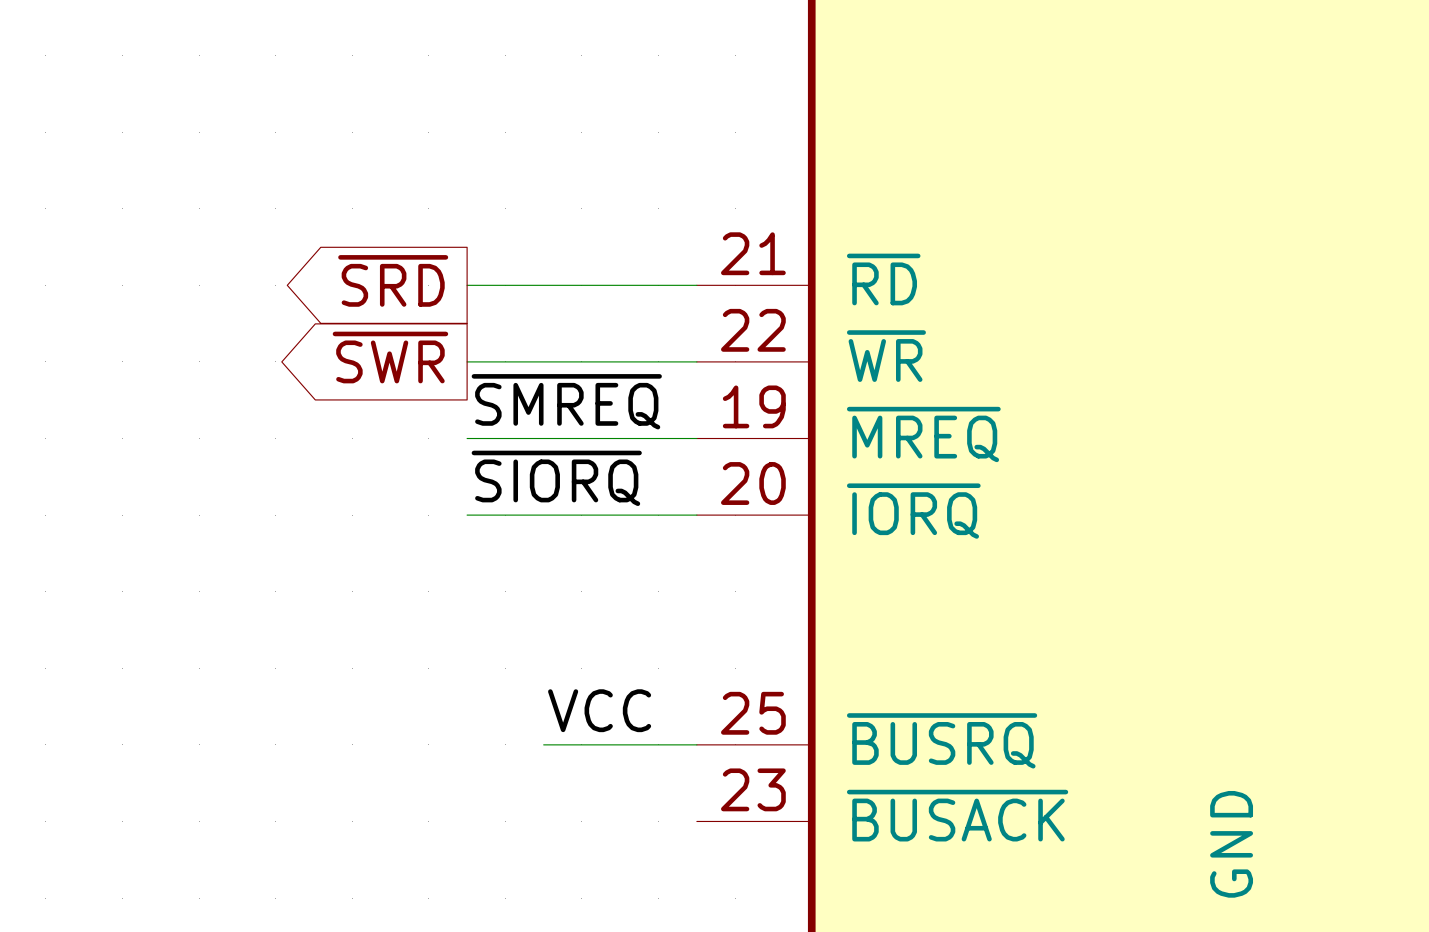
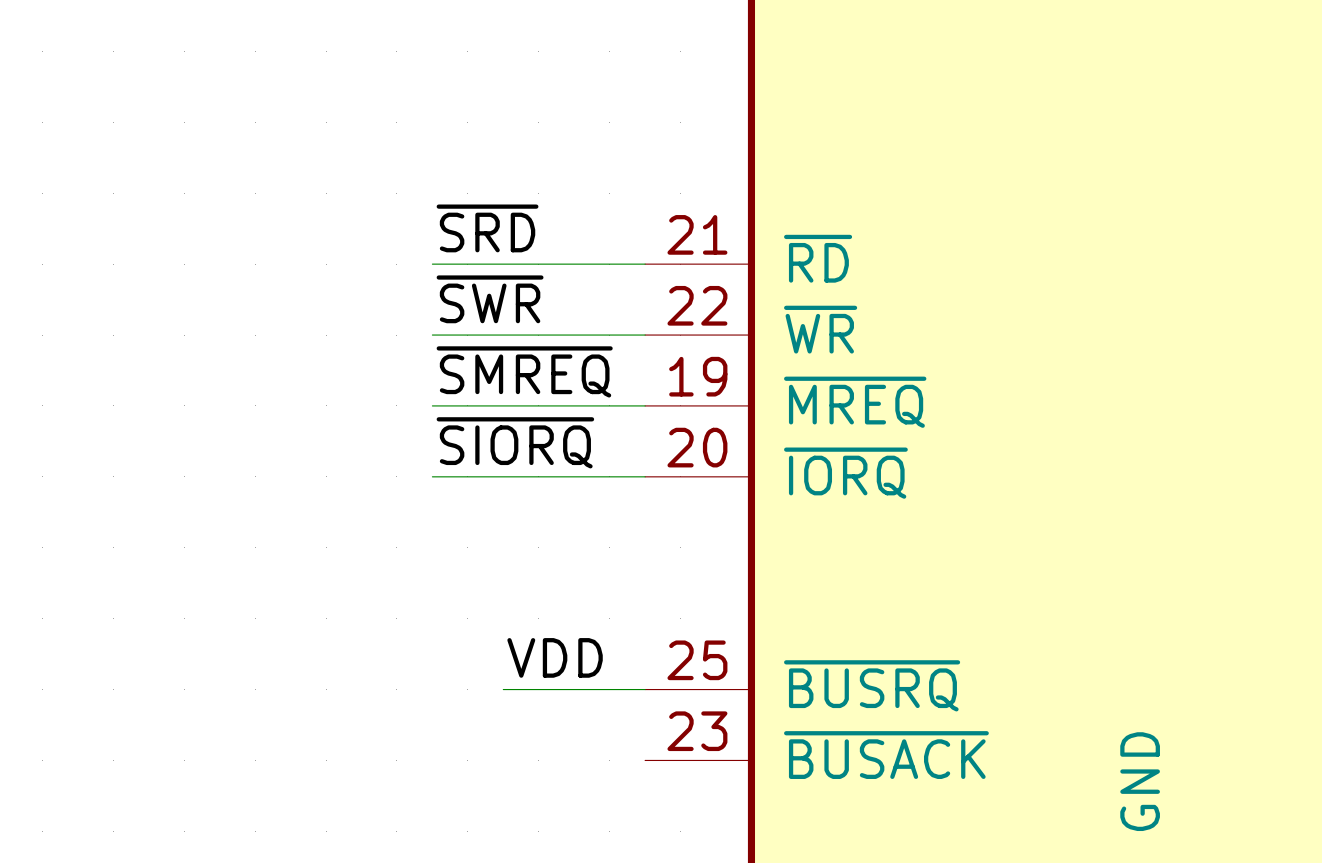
label: none -> ~{SRD} (487, 228)
global label: ~{SRD} (393, 280) -> none
label: none -> ~{SWR} (490, 299)
global label: ~{SWR} (390, 357) -> none
label: VCC (599, 710) -> VDD (555, 657)

